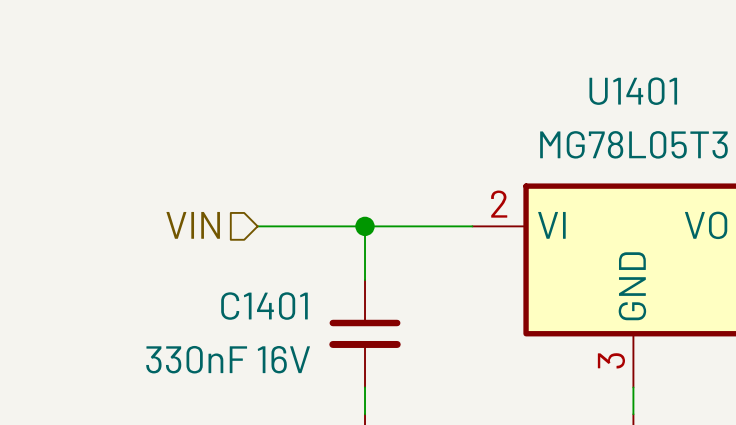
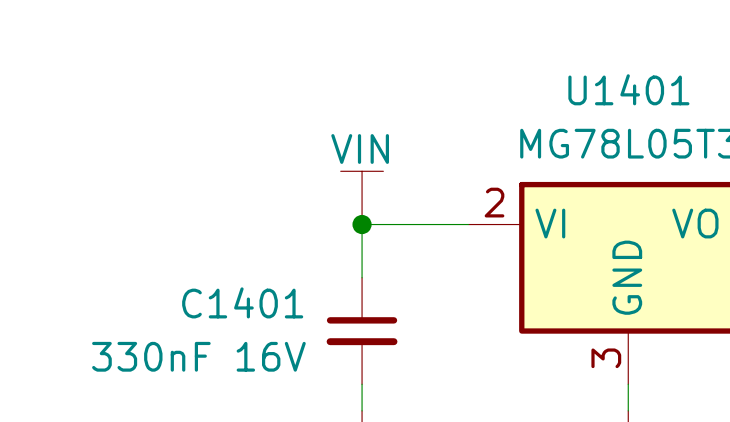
power symbol: none -> VIN (362, 197)
hierarchical label: VIN (193, 225) -> none
wire: (257, 226) (365, 226) -> none

